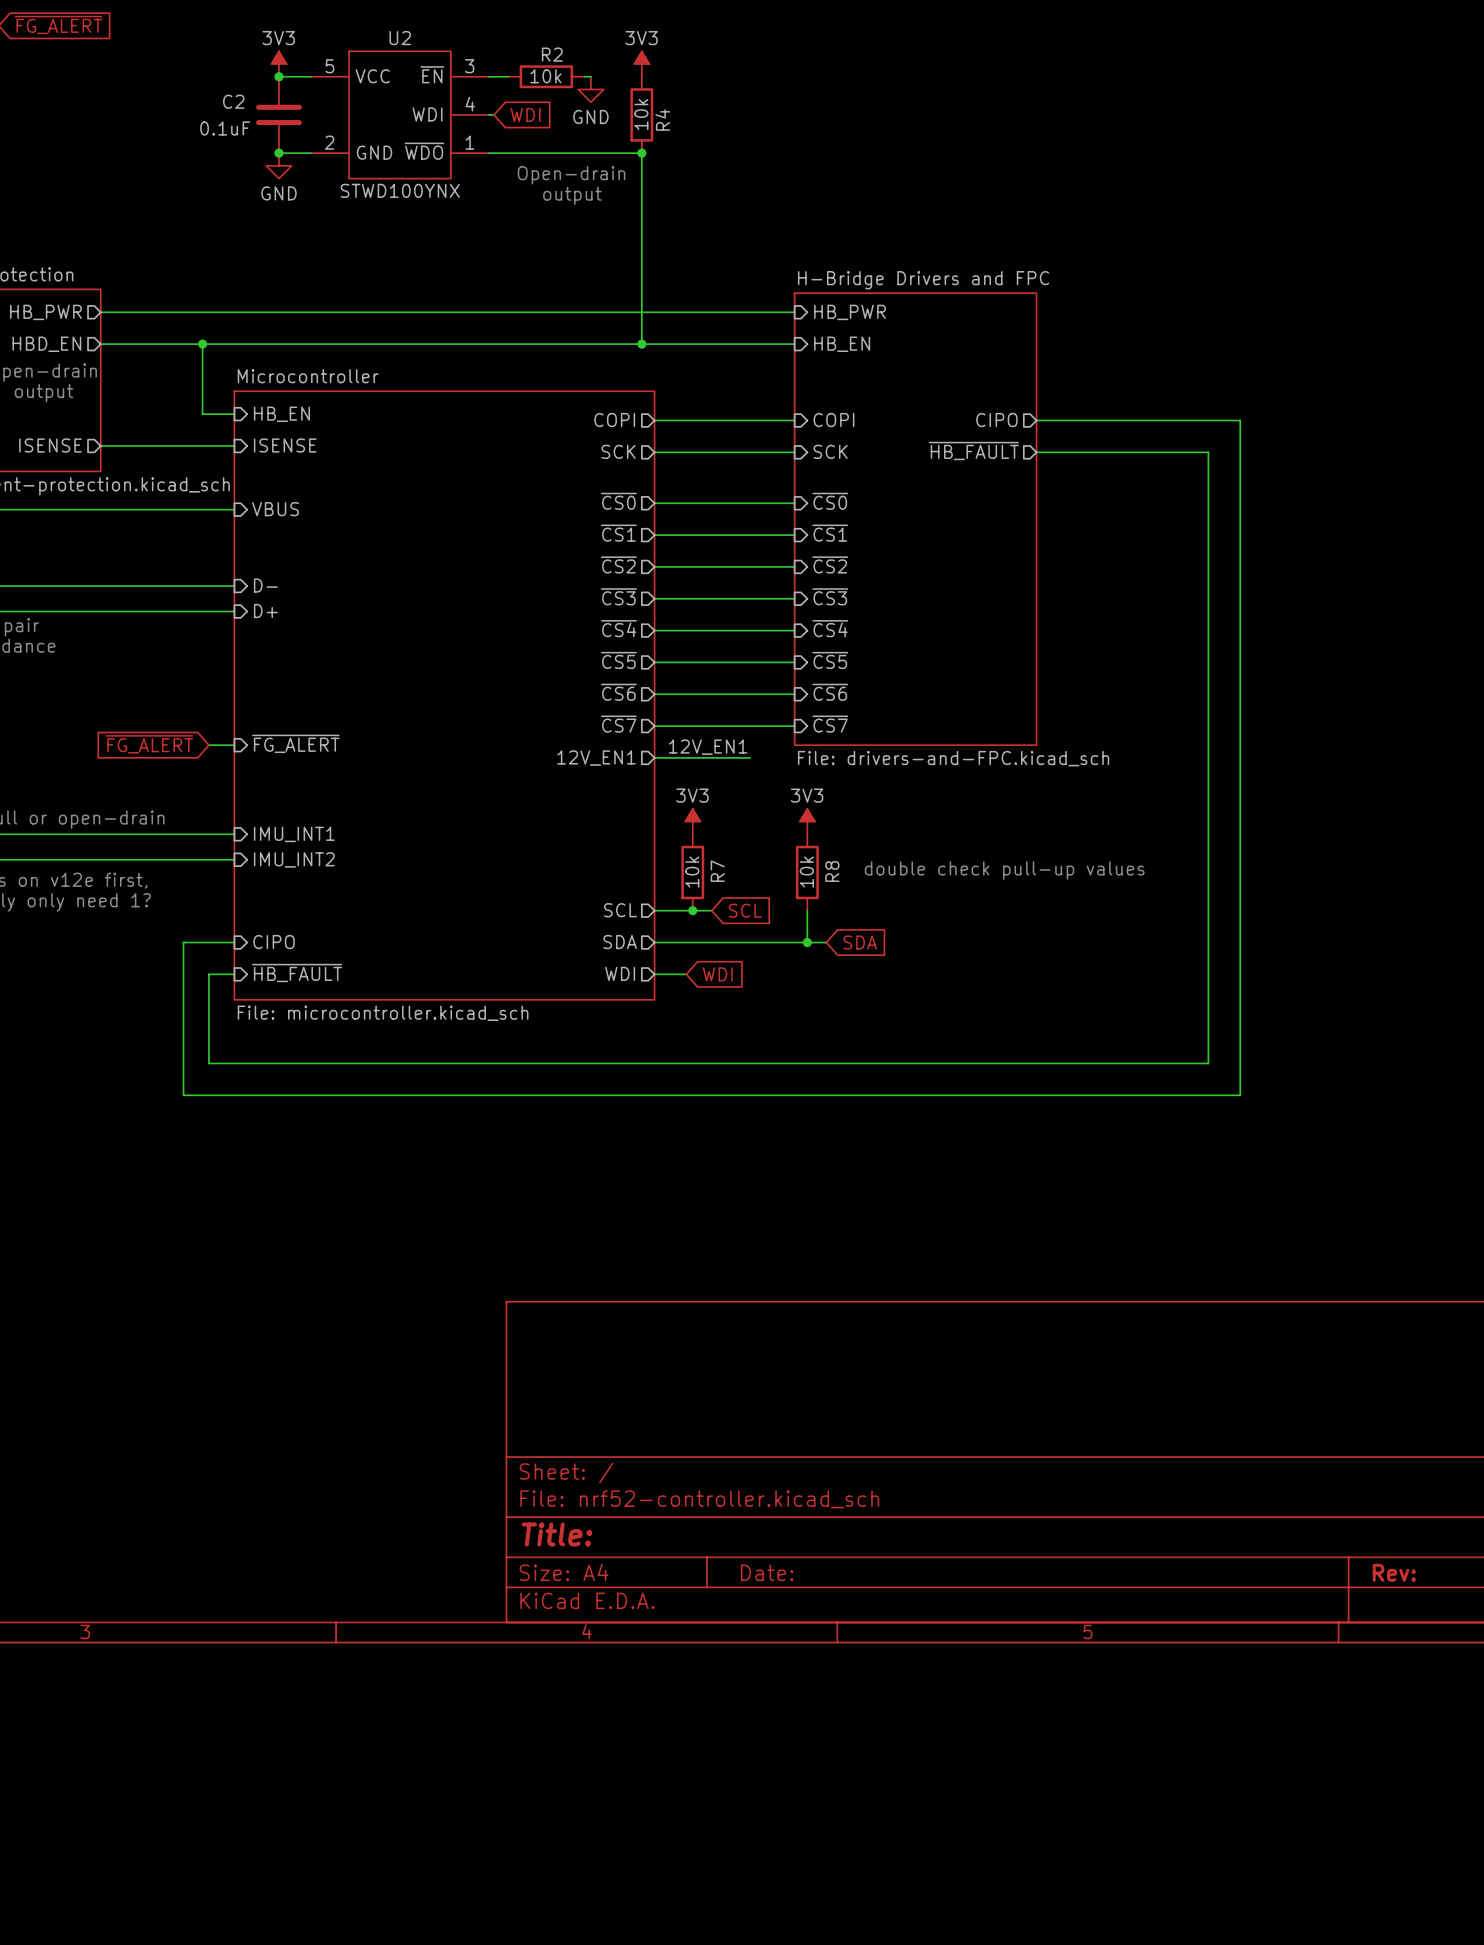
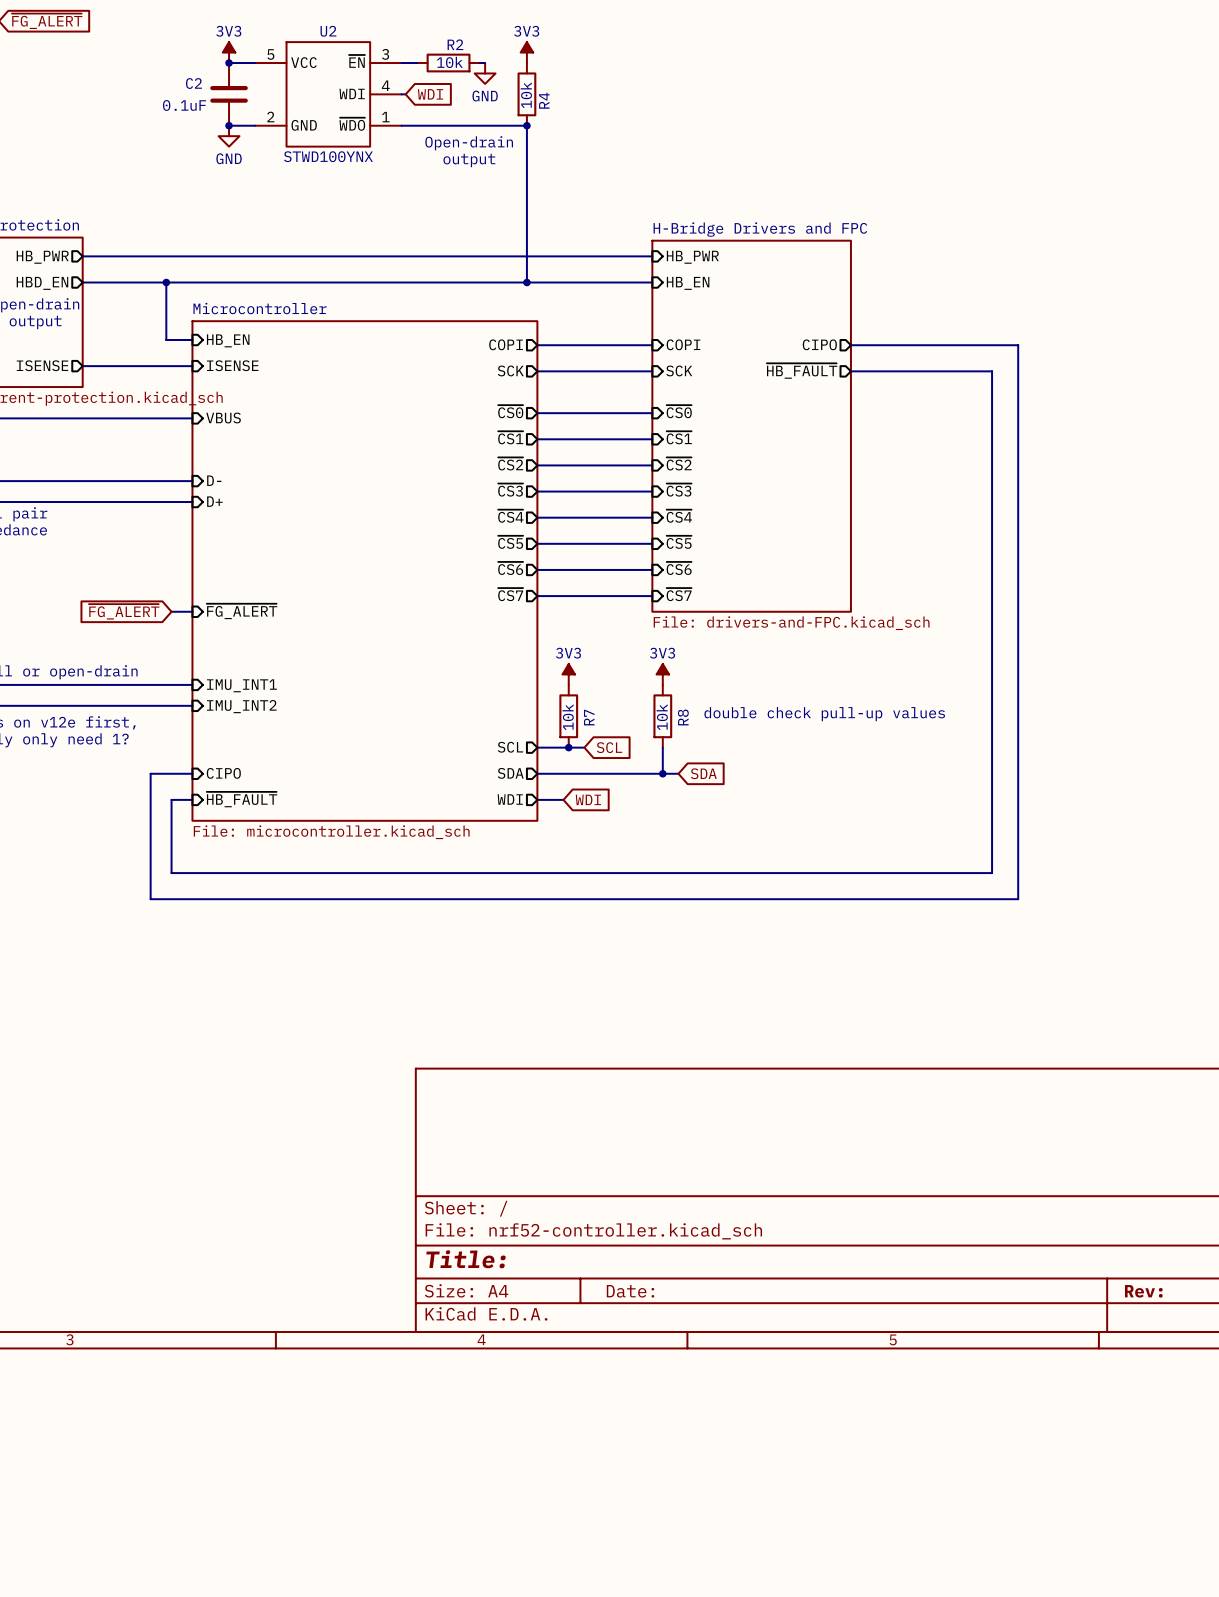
label: 12V_EN1 (708, 747) -> none
wire: (654, 757) (750, 757) -> none
sheet pin: 12V_EN1 (596, 758) -> none

